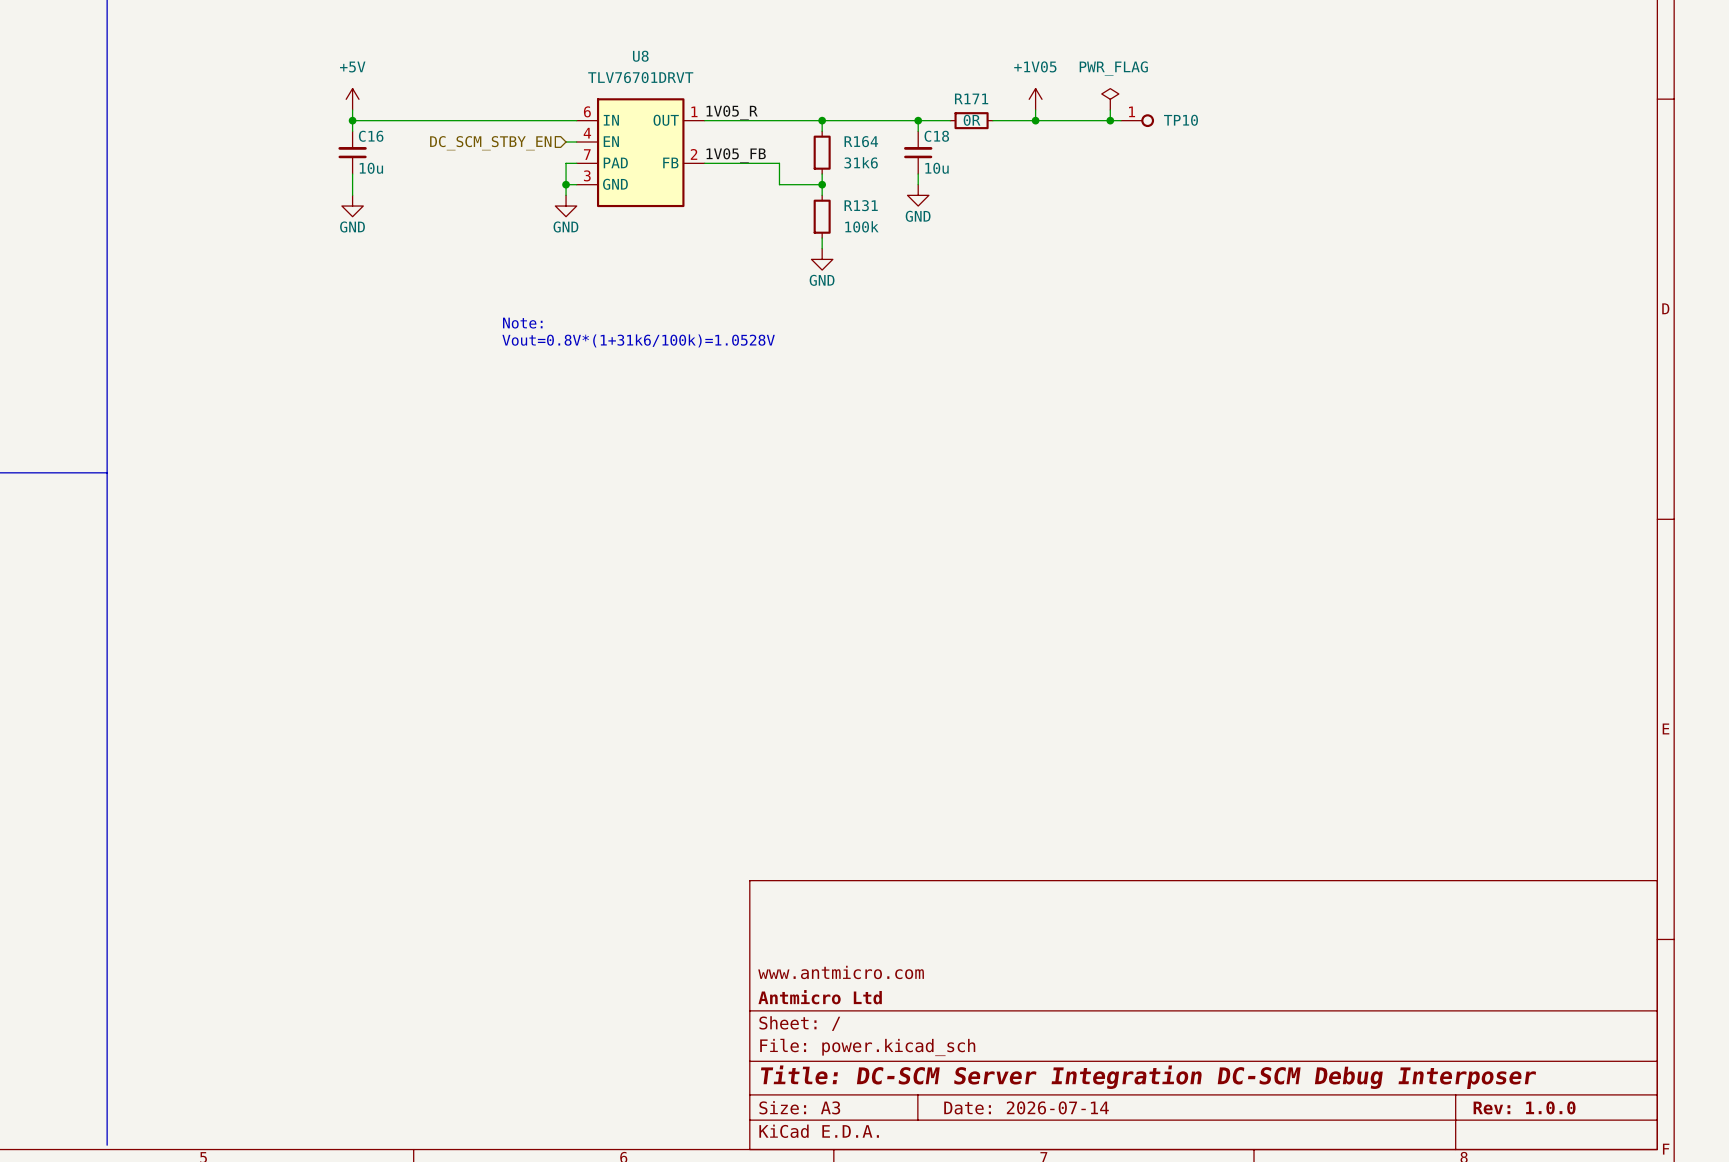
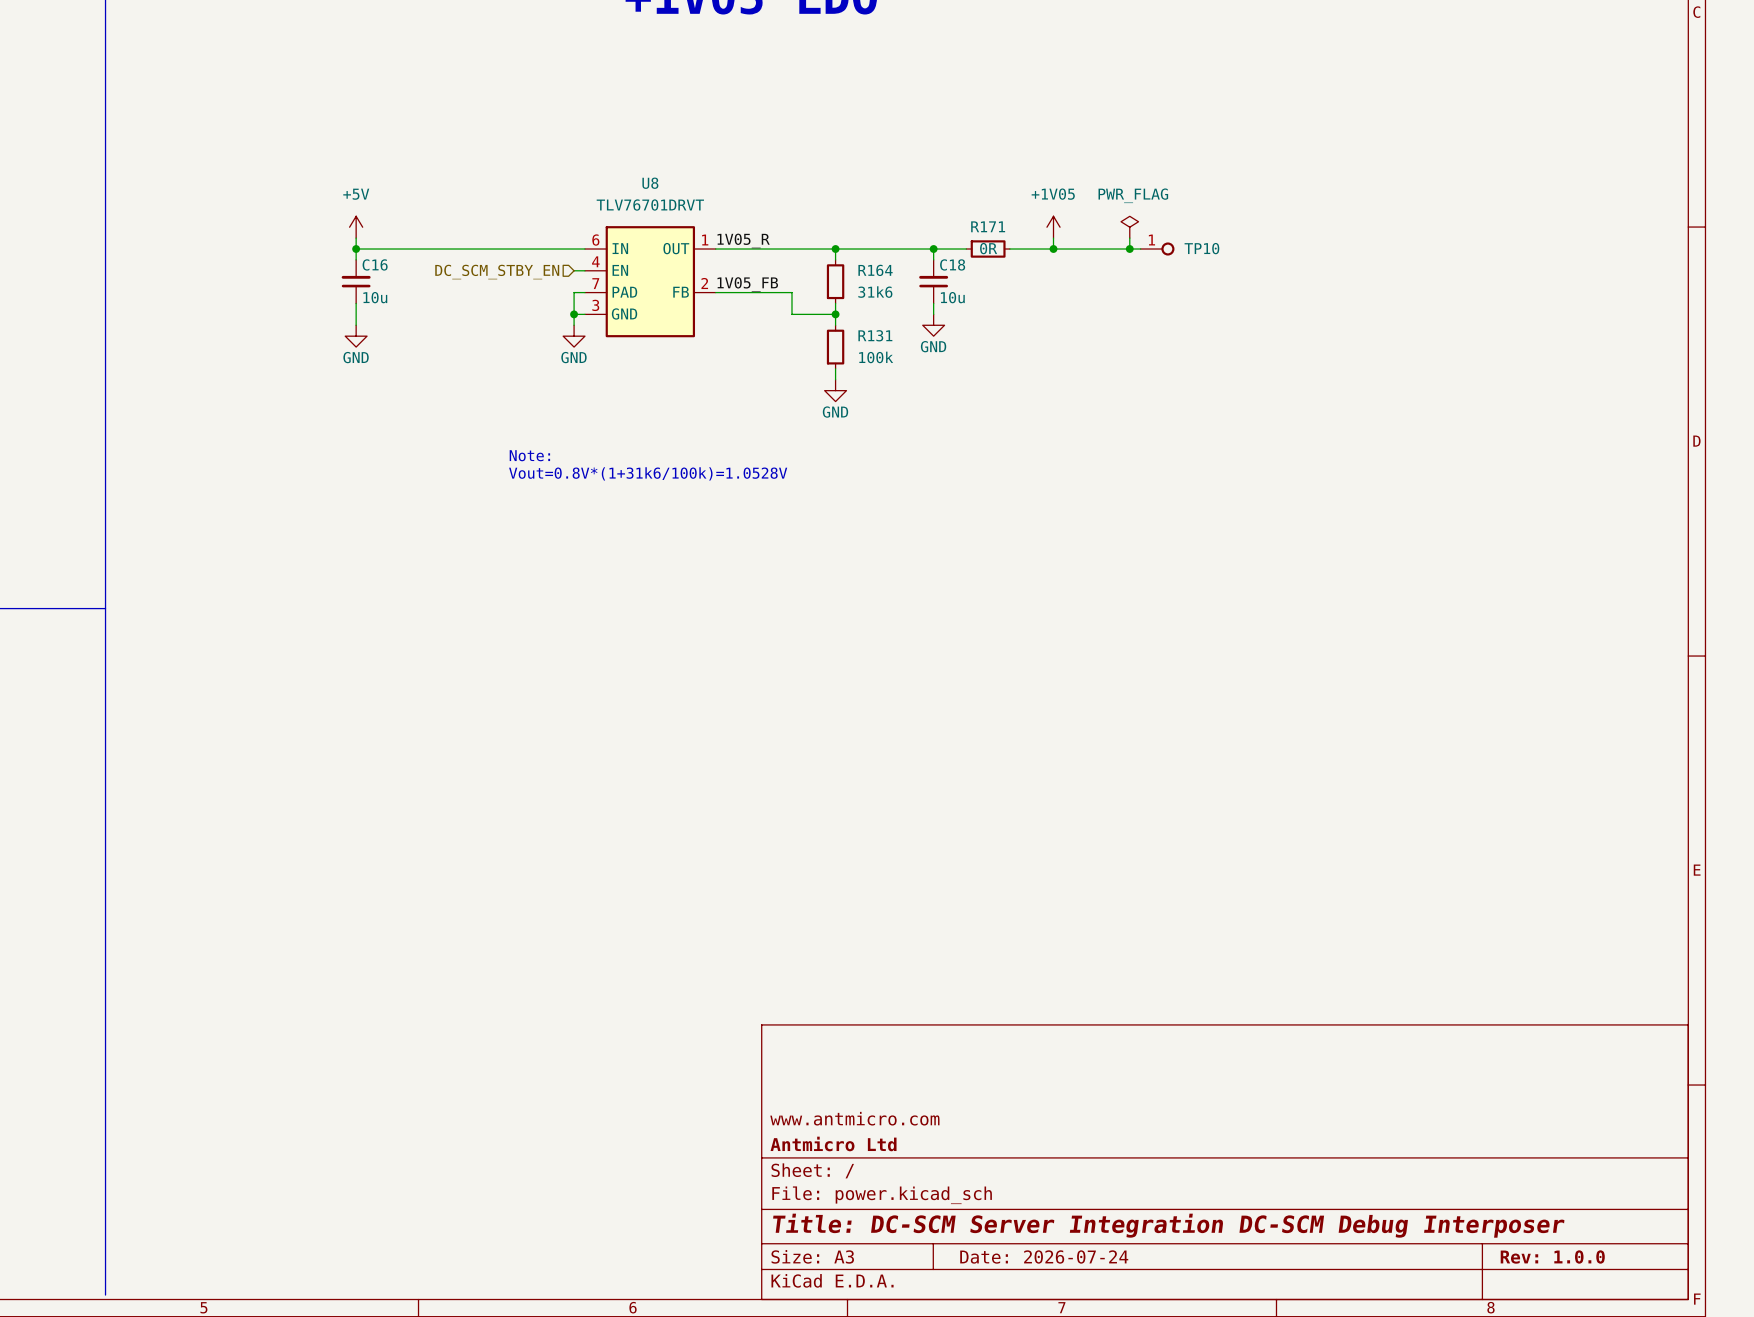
title block: Date: 2026-07-14 (1026, 1107) -> Date: 2026-07-24 (1044, 1256)

